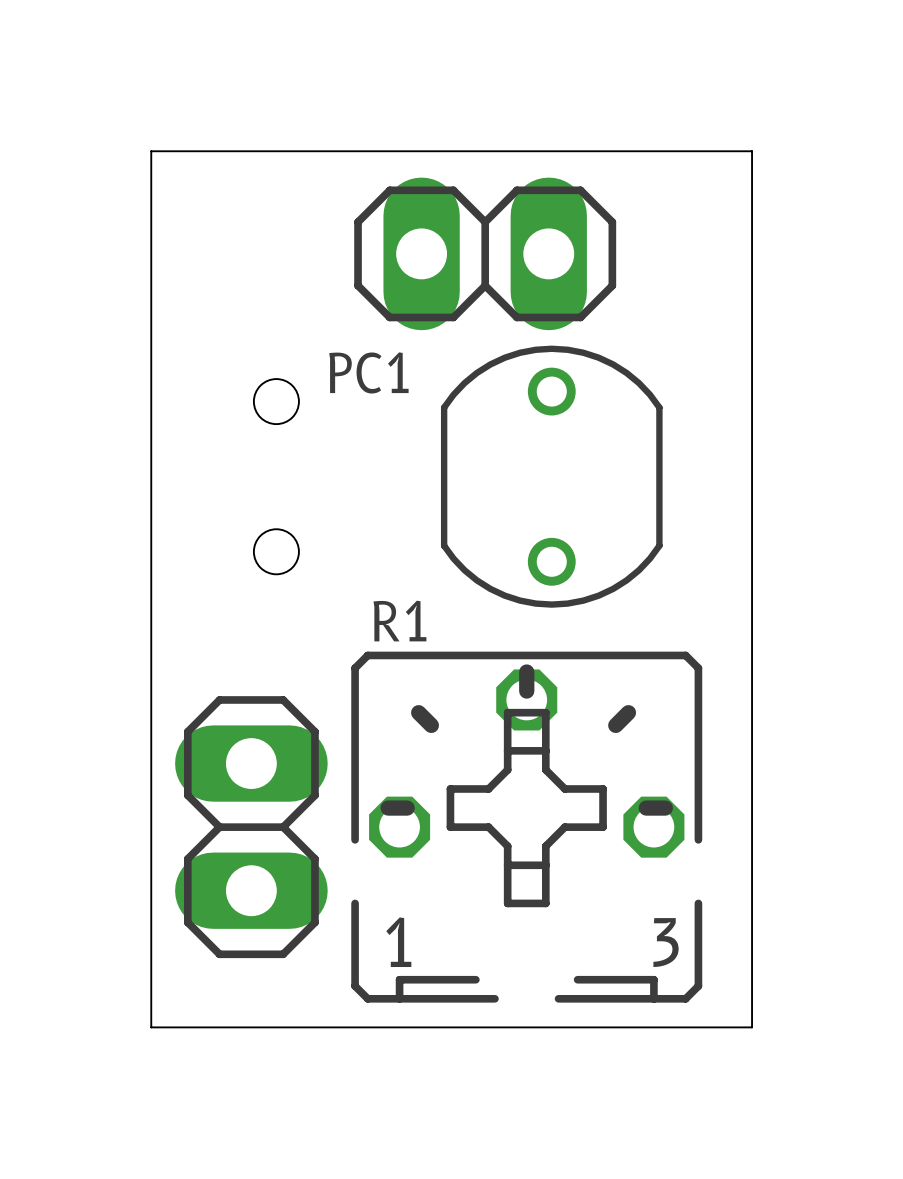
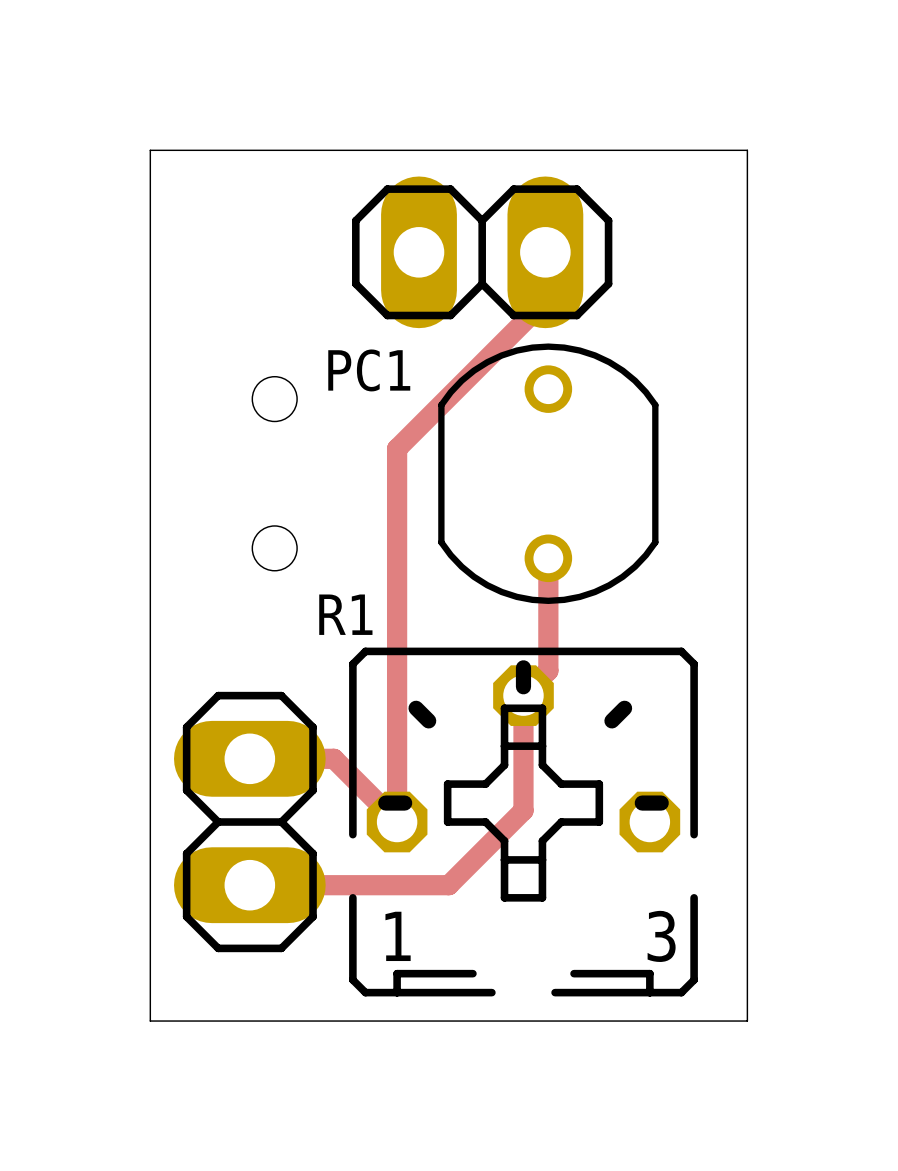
track: none -> (545, 252) (545, 300) (397, 448) (397, 822) (333, 758) (249, 758)
track: none -> (548, 558) (548, 670) (523, 695) (523, 810) (448, 885) (249, 885)
R1 name position: R1 (399, 621) -> R1 (345, 614)

